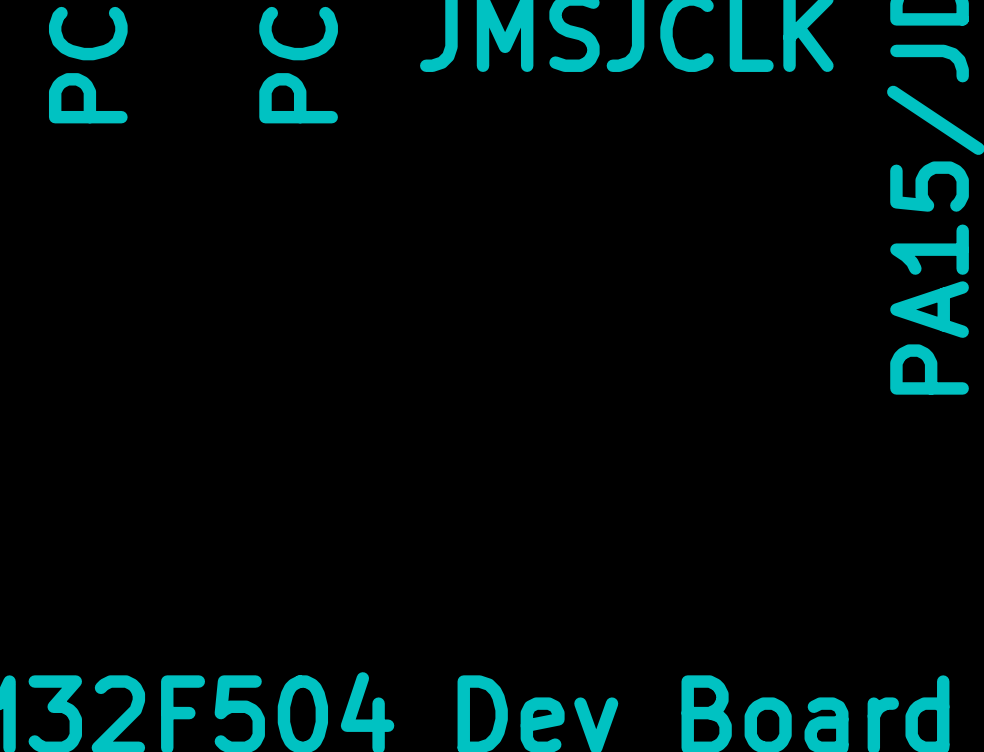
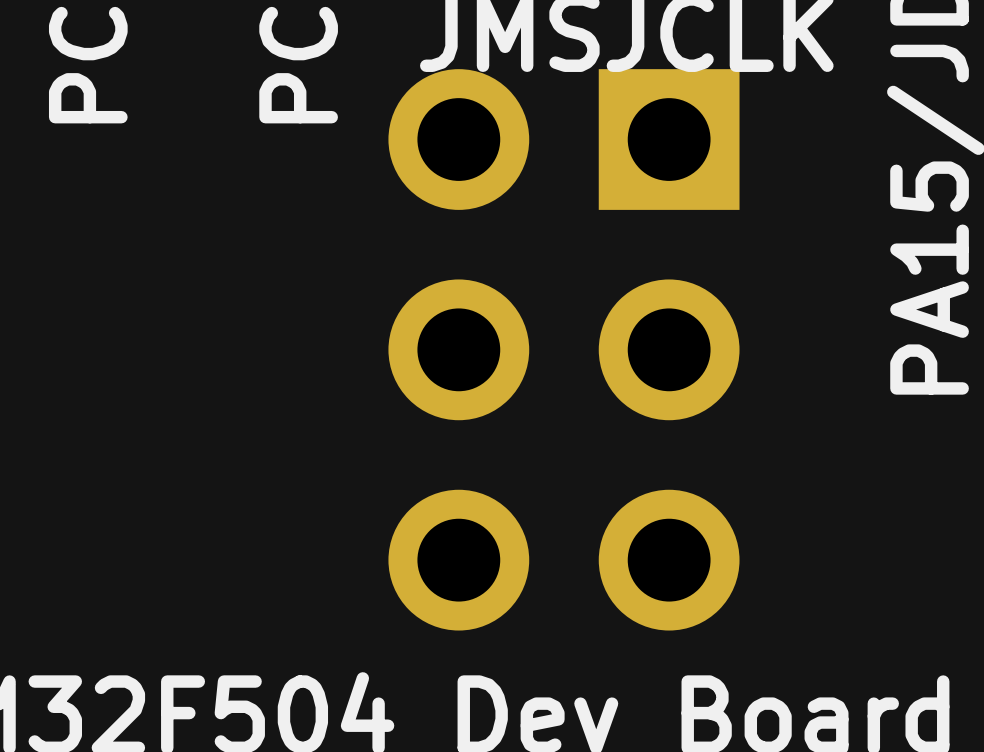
part: none -> (563, 349)

